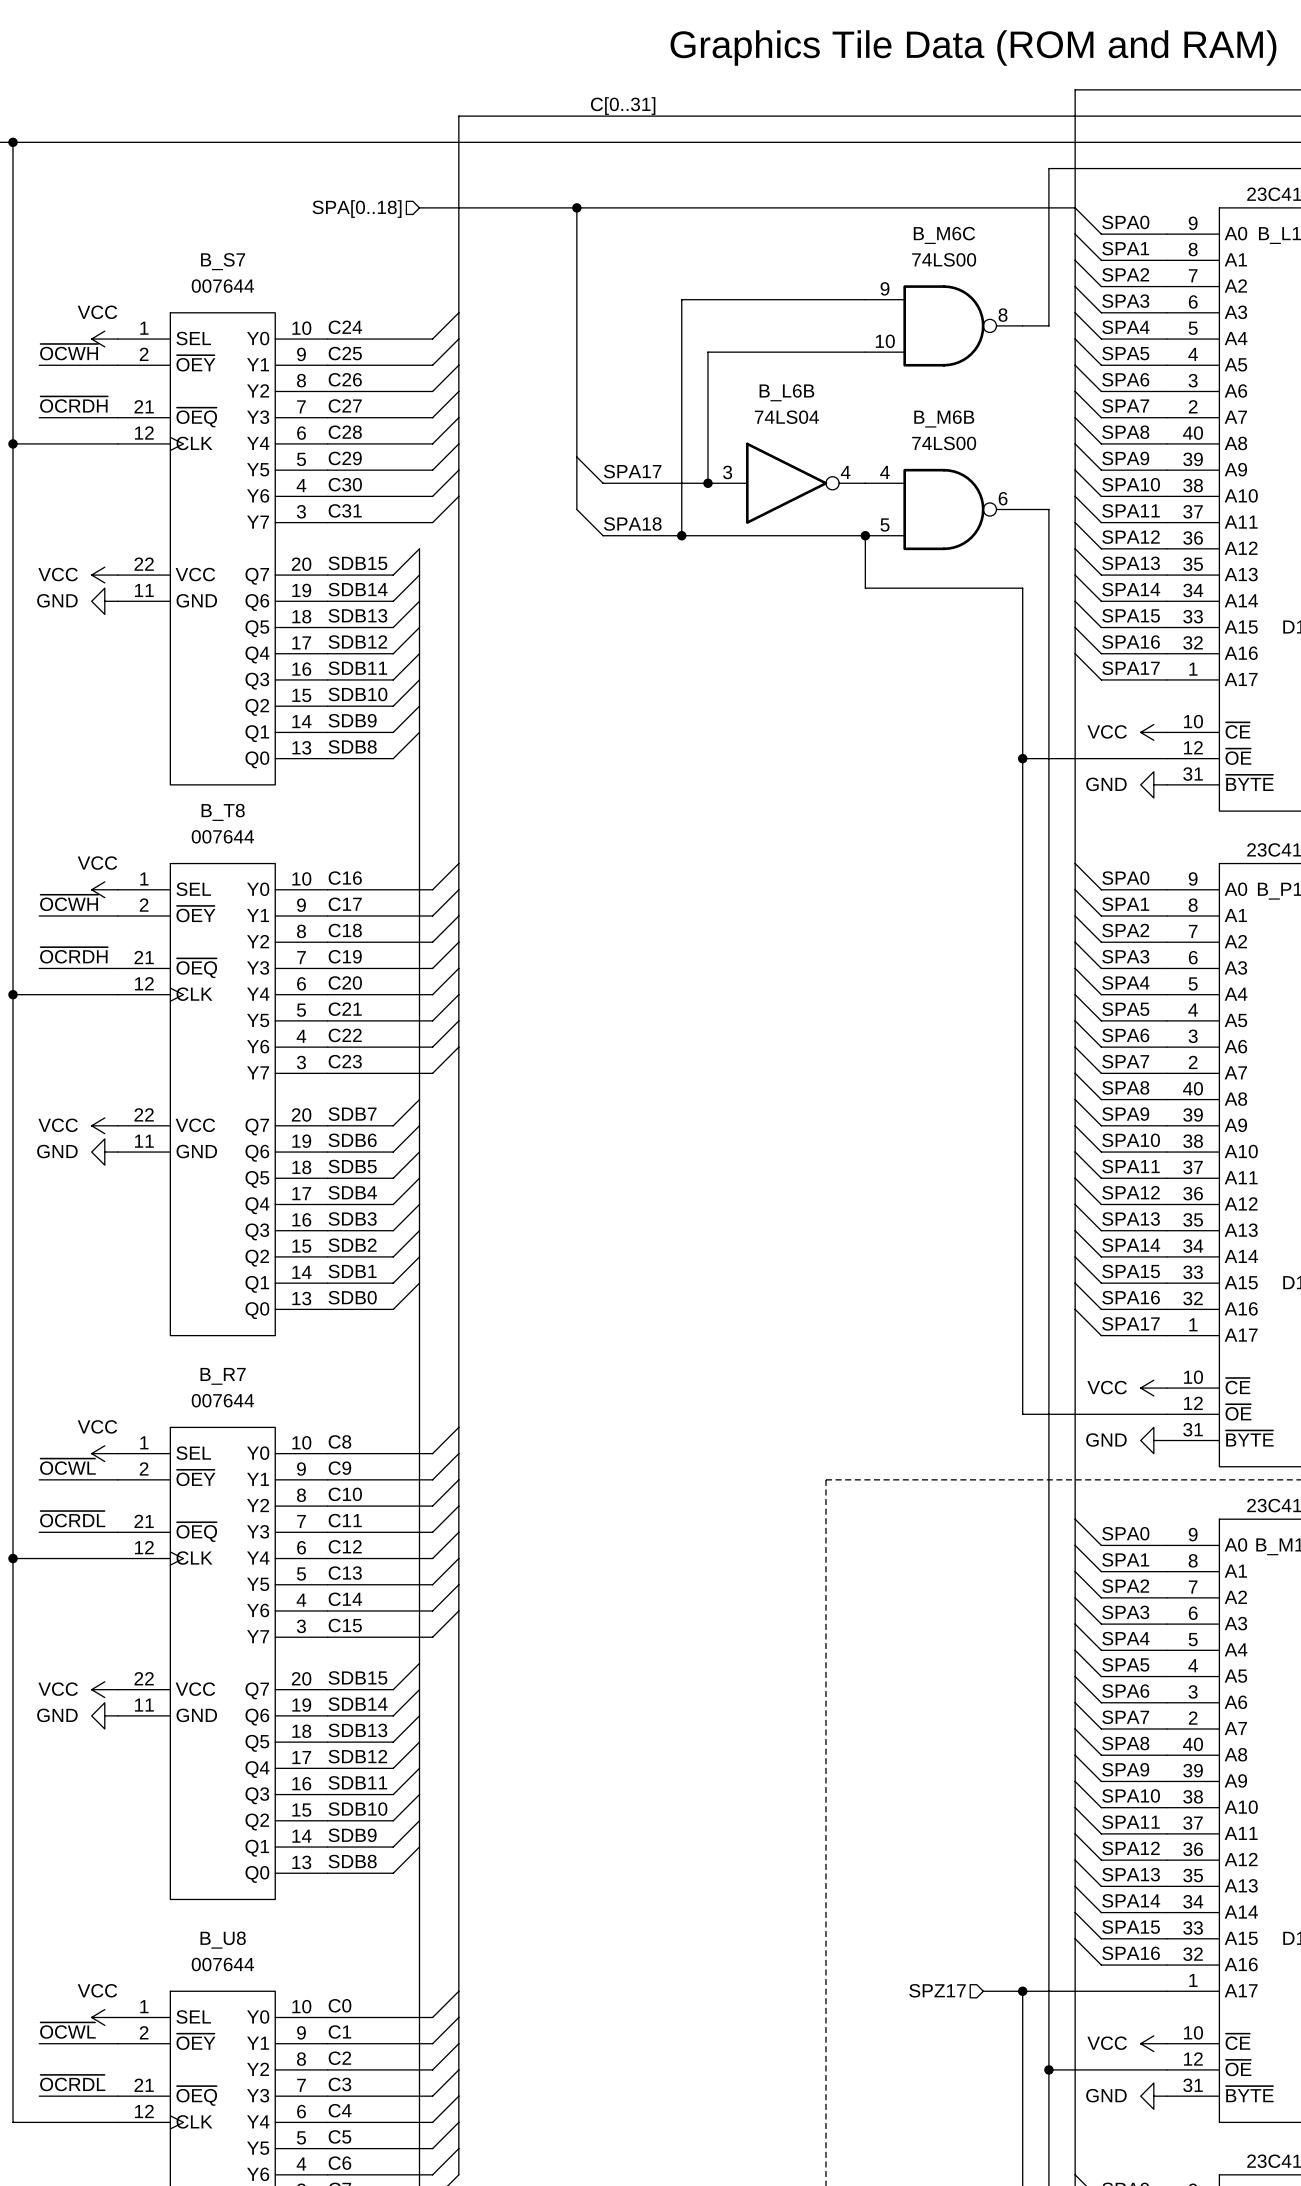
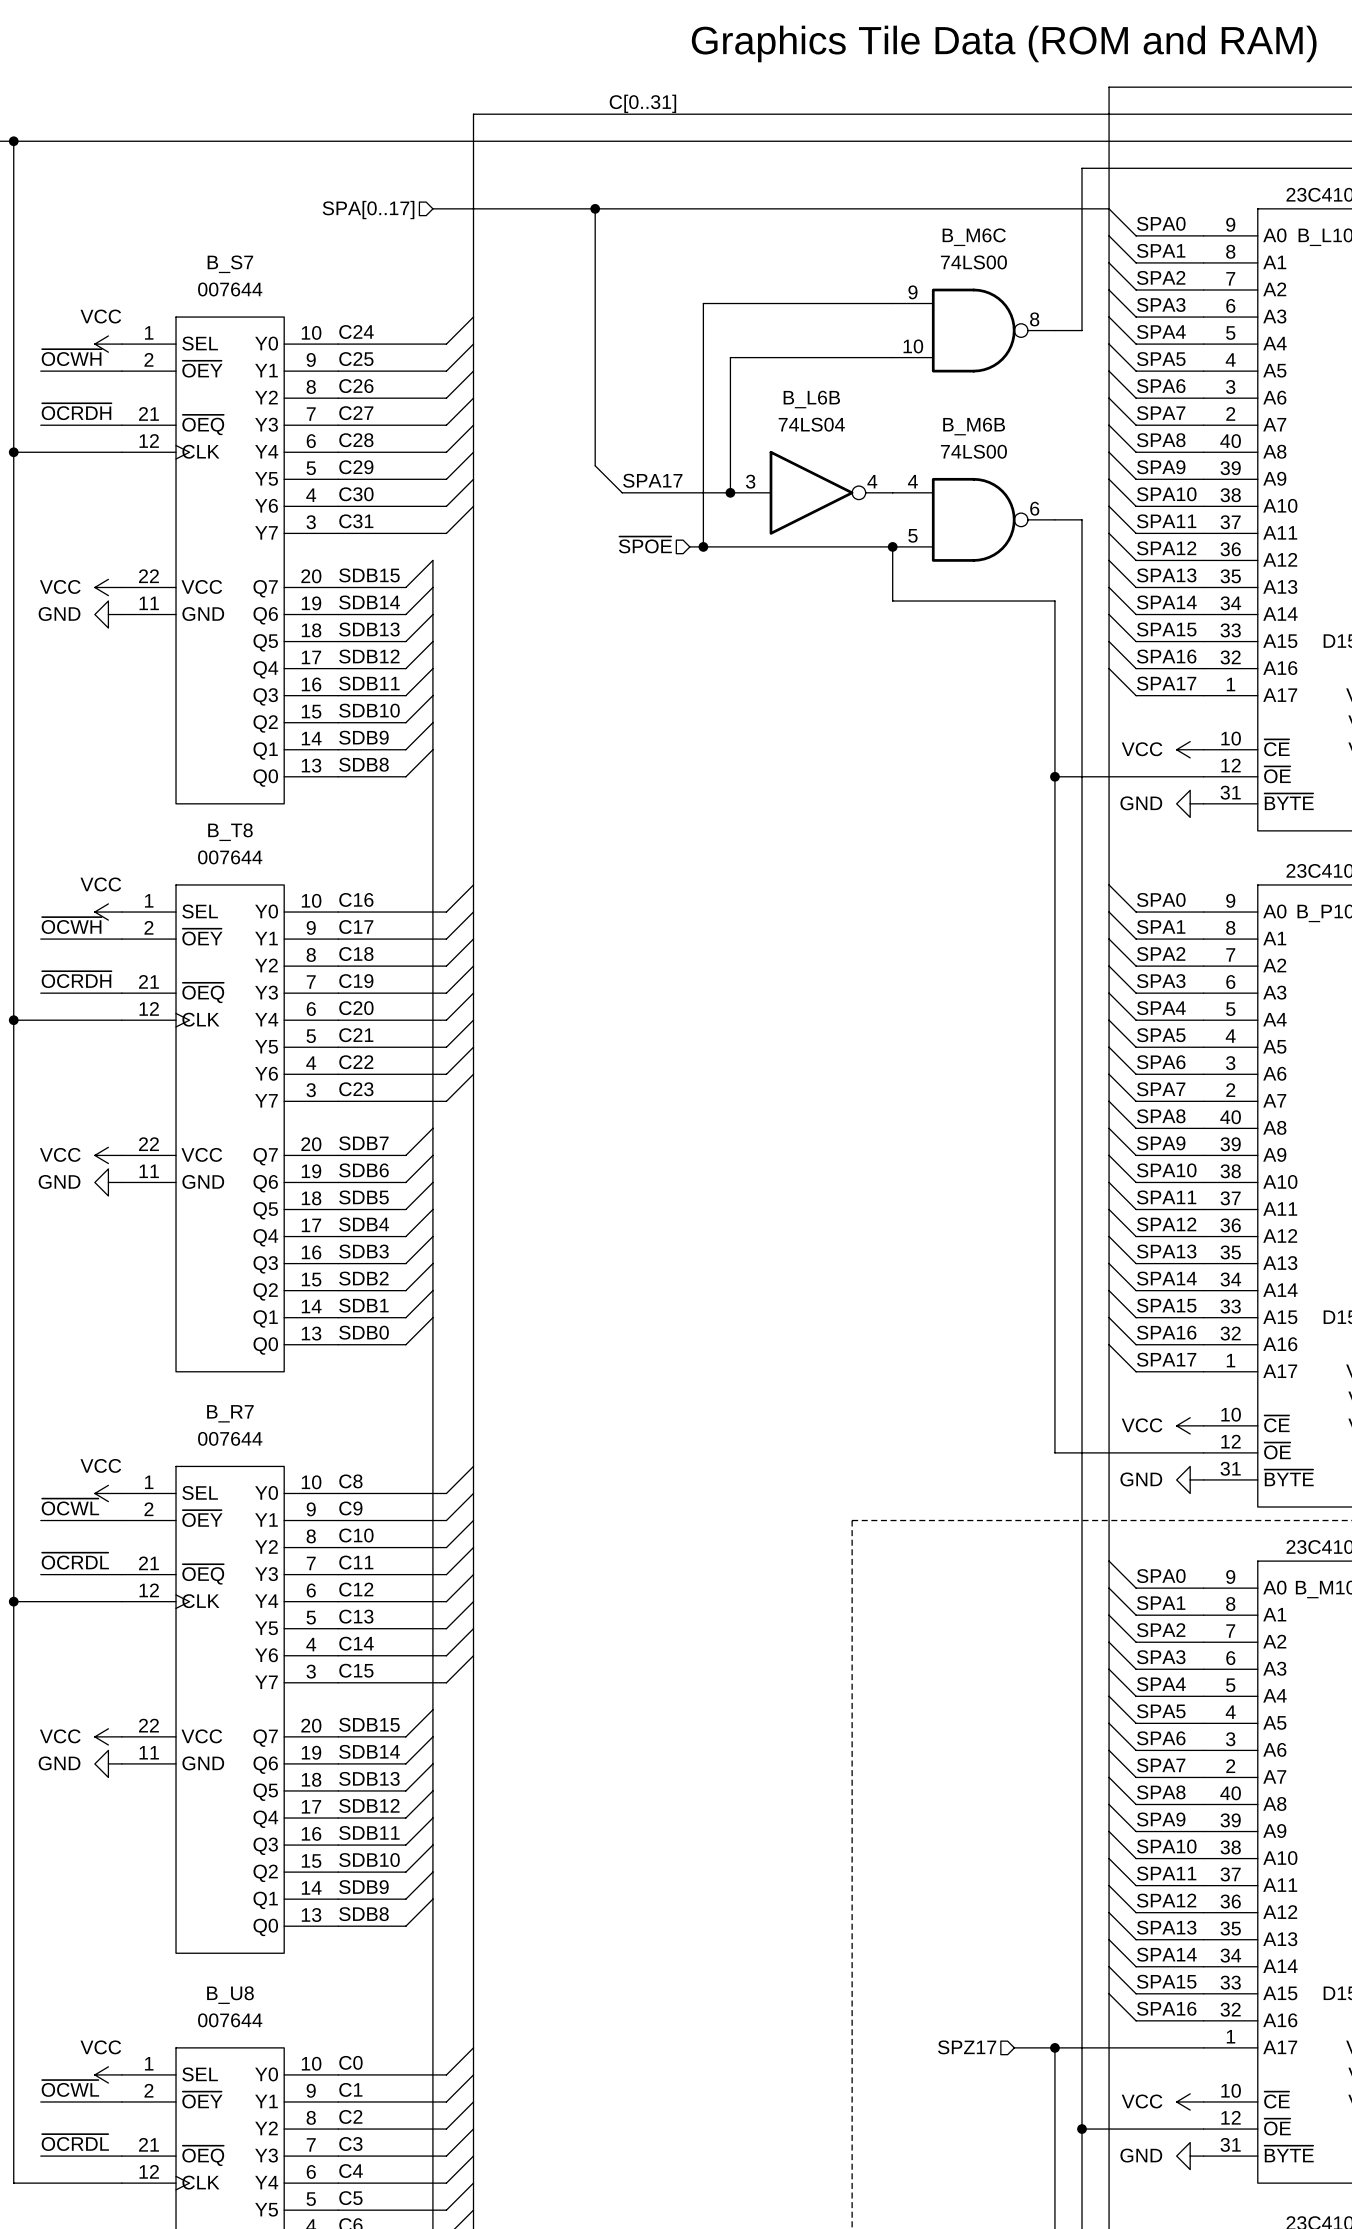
hierarchical label: SPA[0..18] (357, 209) -> SPA[0..17] (368, 210)
bus: (576, 457) (576, 509) -> none
wire: (576, 509) (603, 535) (668, 535) -> none
label: SPA18 (632, 524) -> none
hierarchical label: none -> ~{SPOE} (645, 544)

